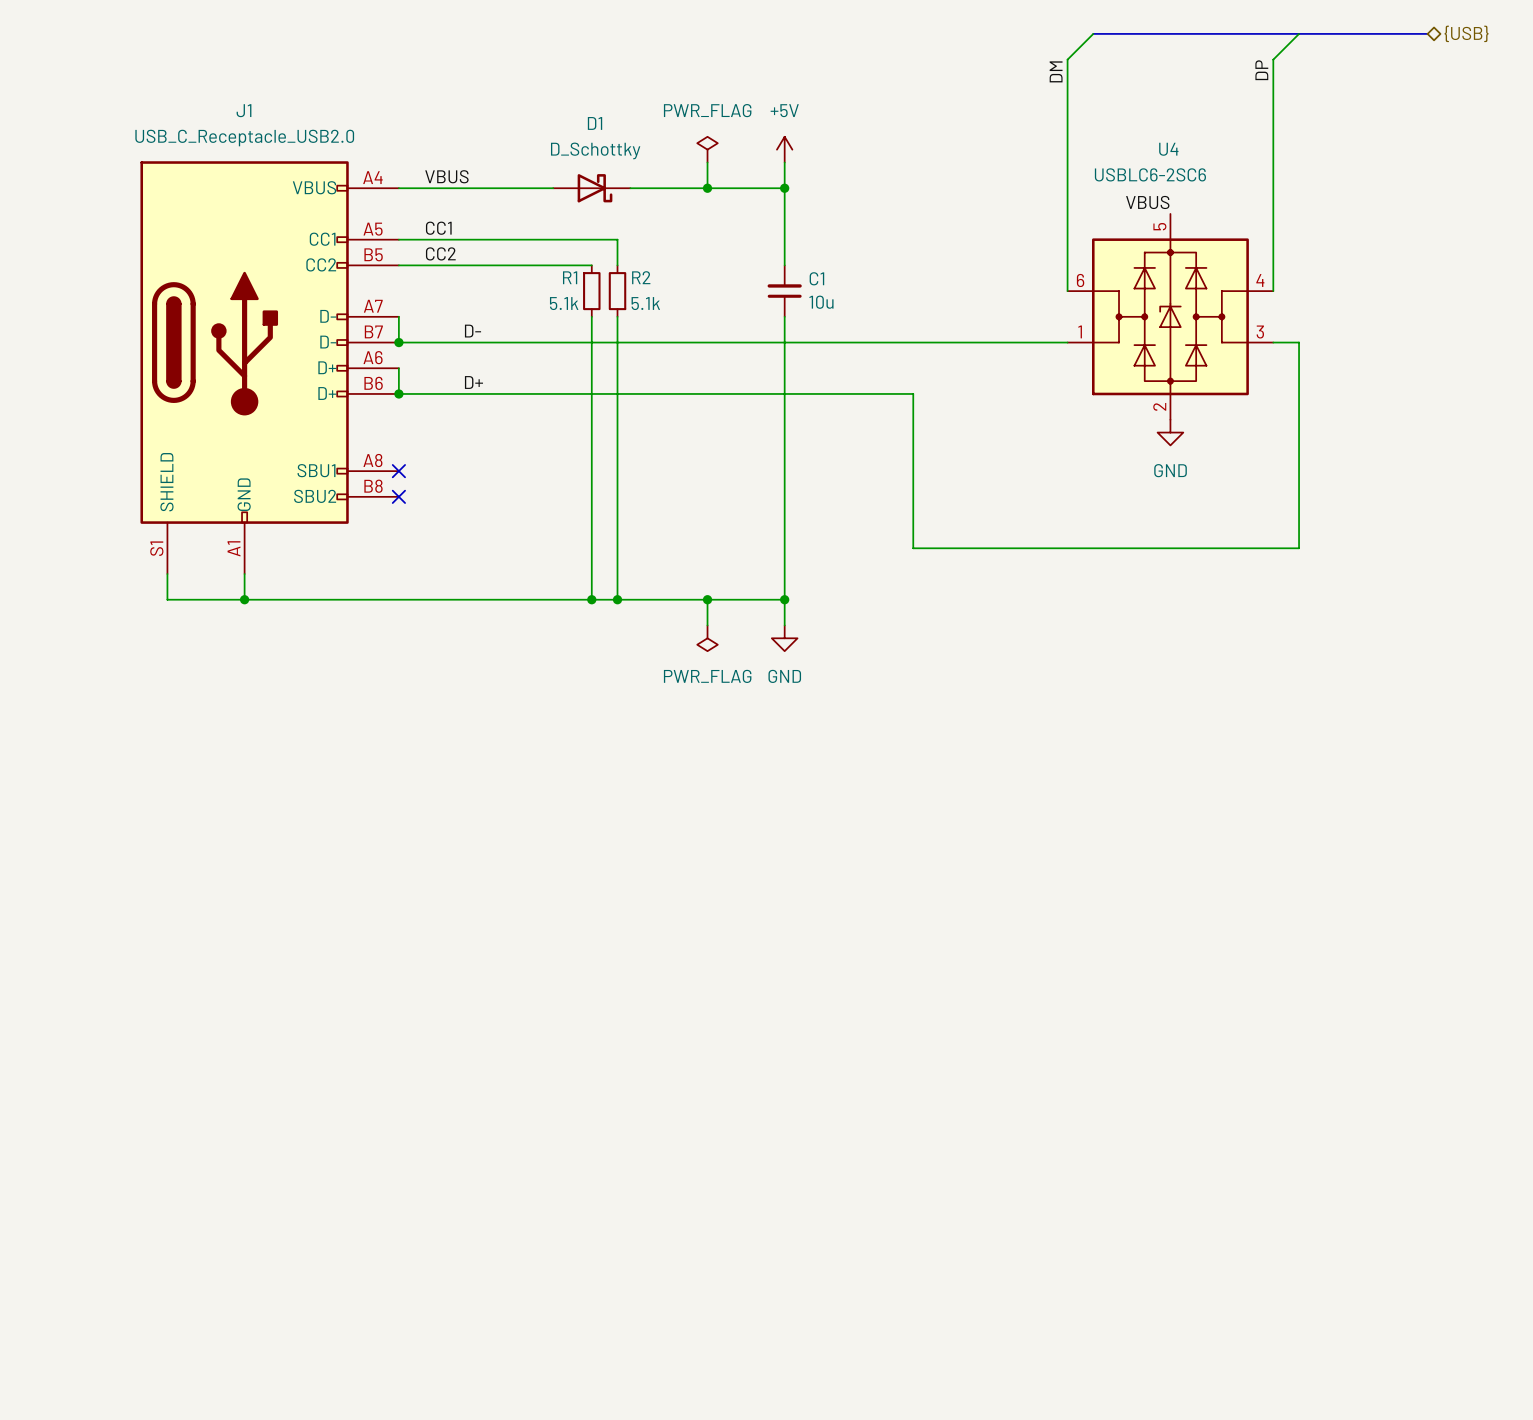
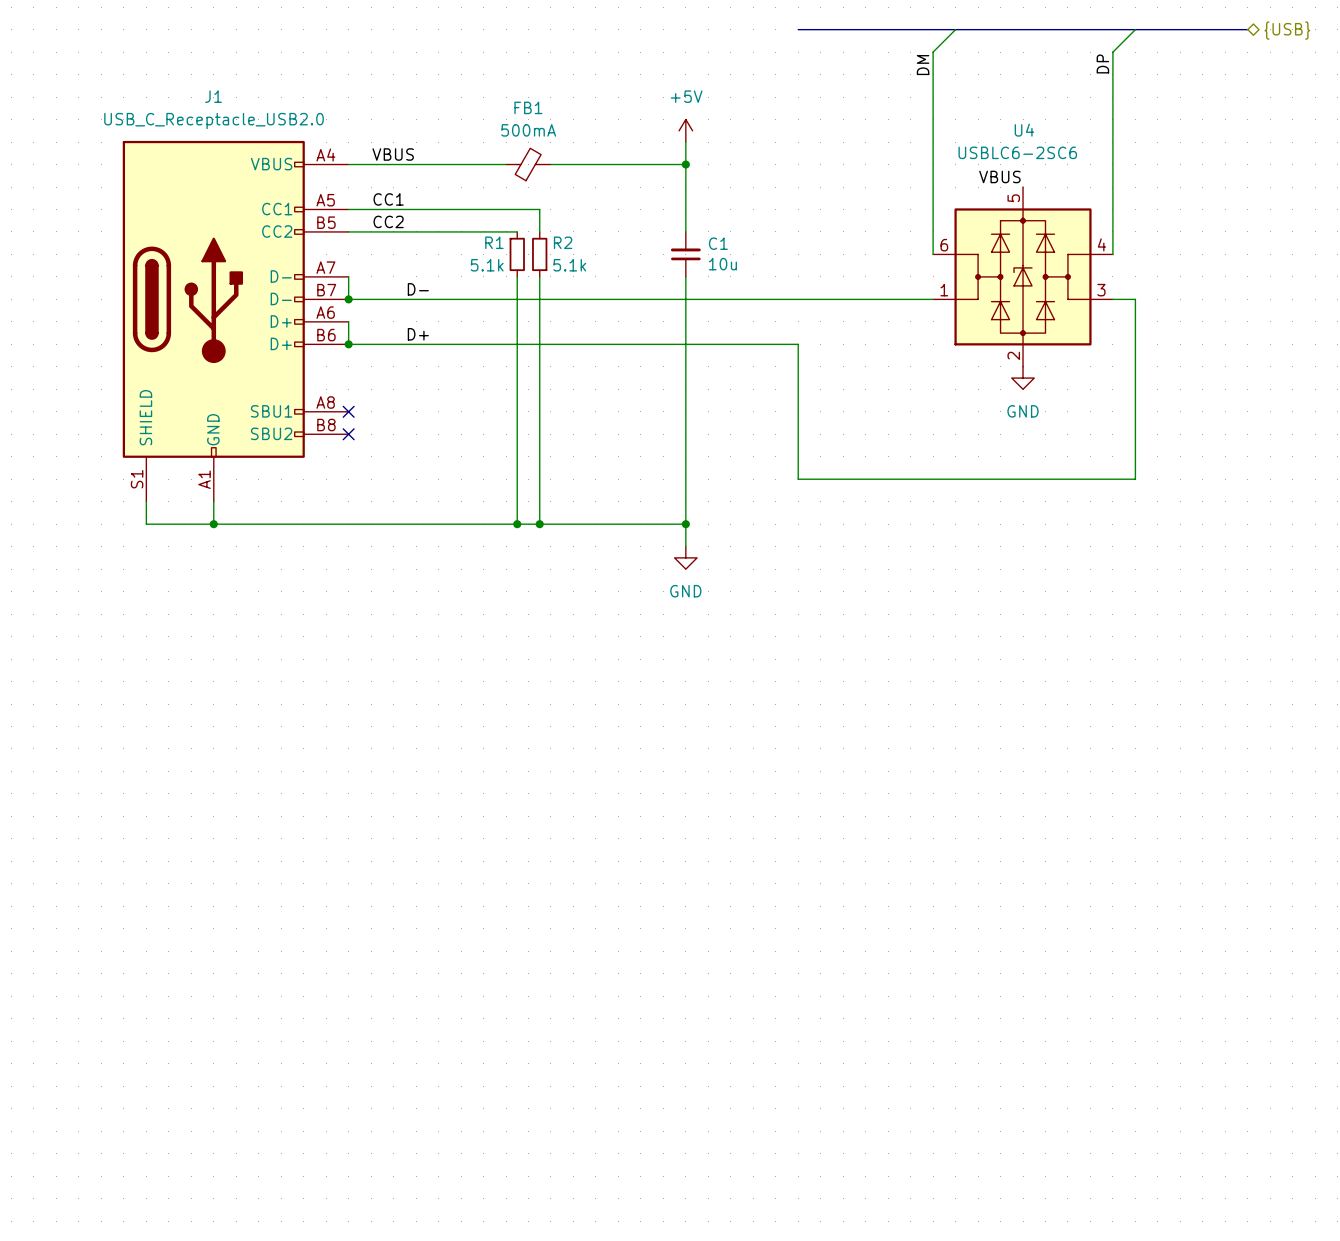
bus: none -> (798, 29) (955, 29)
power symbol: PWR_FLAG (707, 149) -> none
wire: (707, 162) (707, 188) -> none
D1: D_Schottky (591, 188) -> none
FB1: none -> 500mA (528, 164)
junction: (707, 188) -> none
wire: (707, 599) (707, 625) -> none
junction: (707, 599) -> none
power symbol: PWR_FLAG (707, 638) -> none

